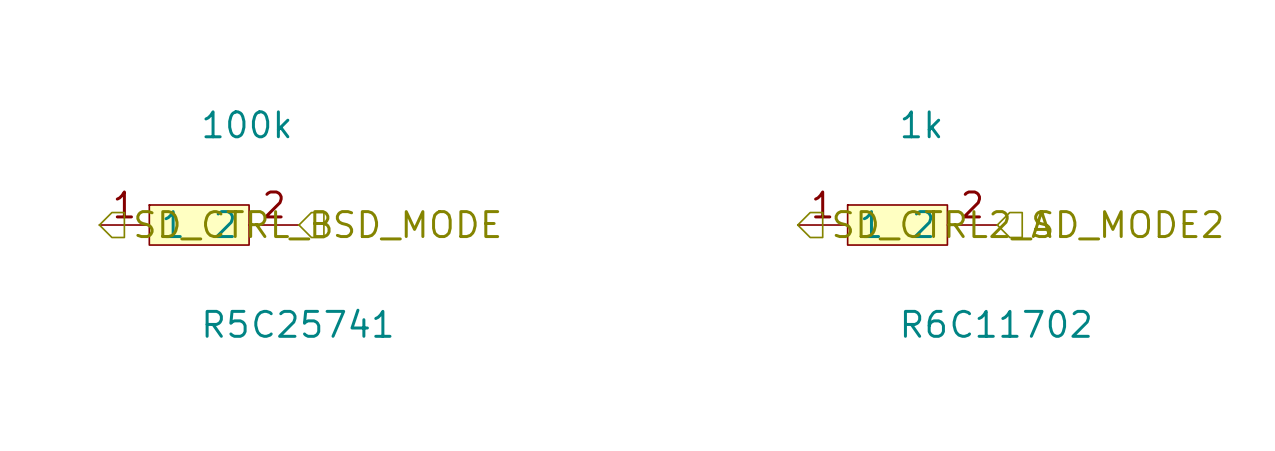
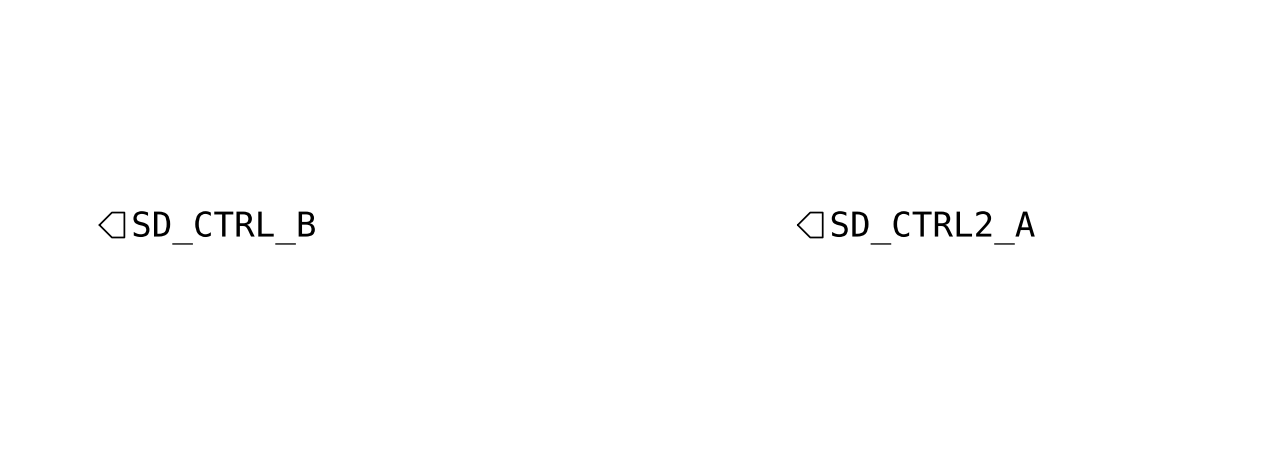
R5: 100k (199, 225) -> none
hierarchical label: SD_MODE (417, 225) -> none
R6: 1k (897, 225) -> none
hierarchical label: SD_MODE2 (1127, 225) -> none

